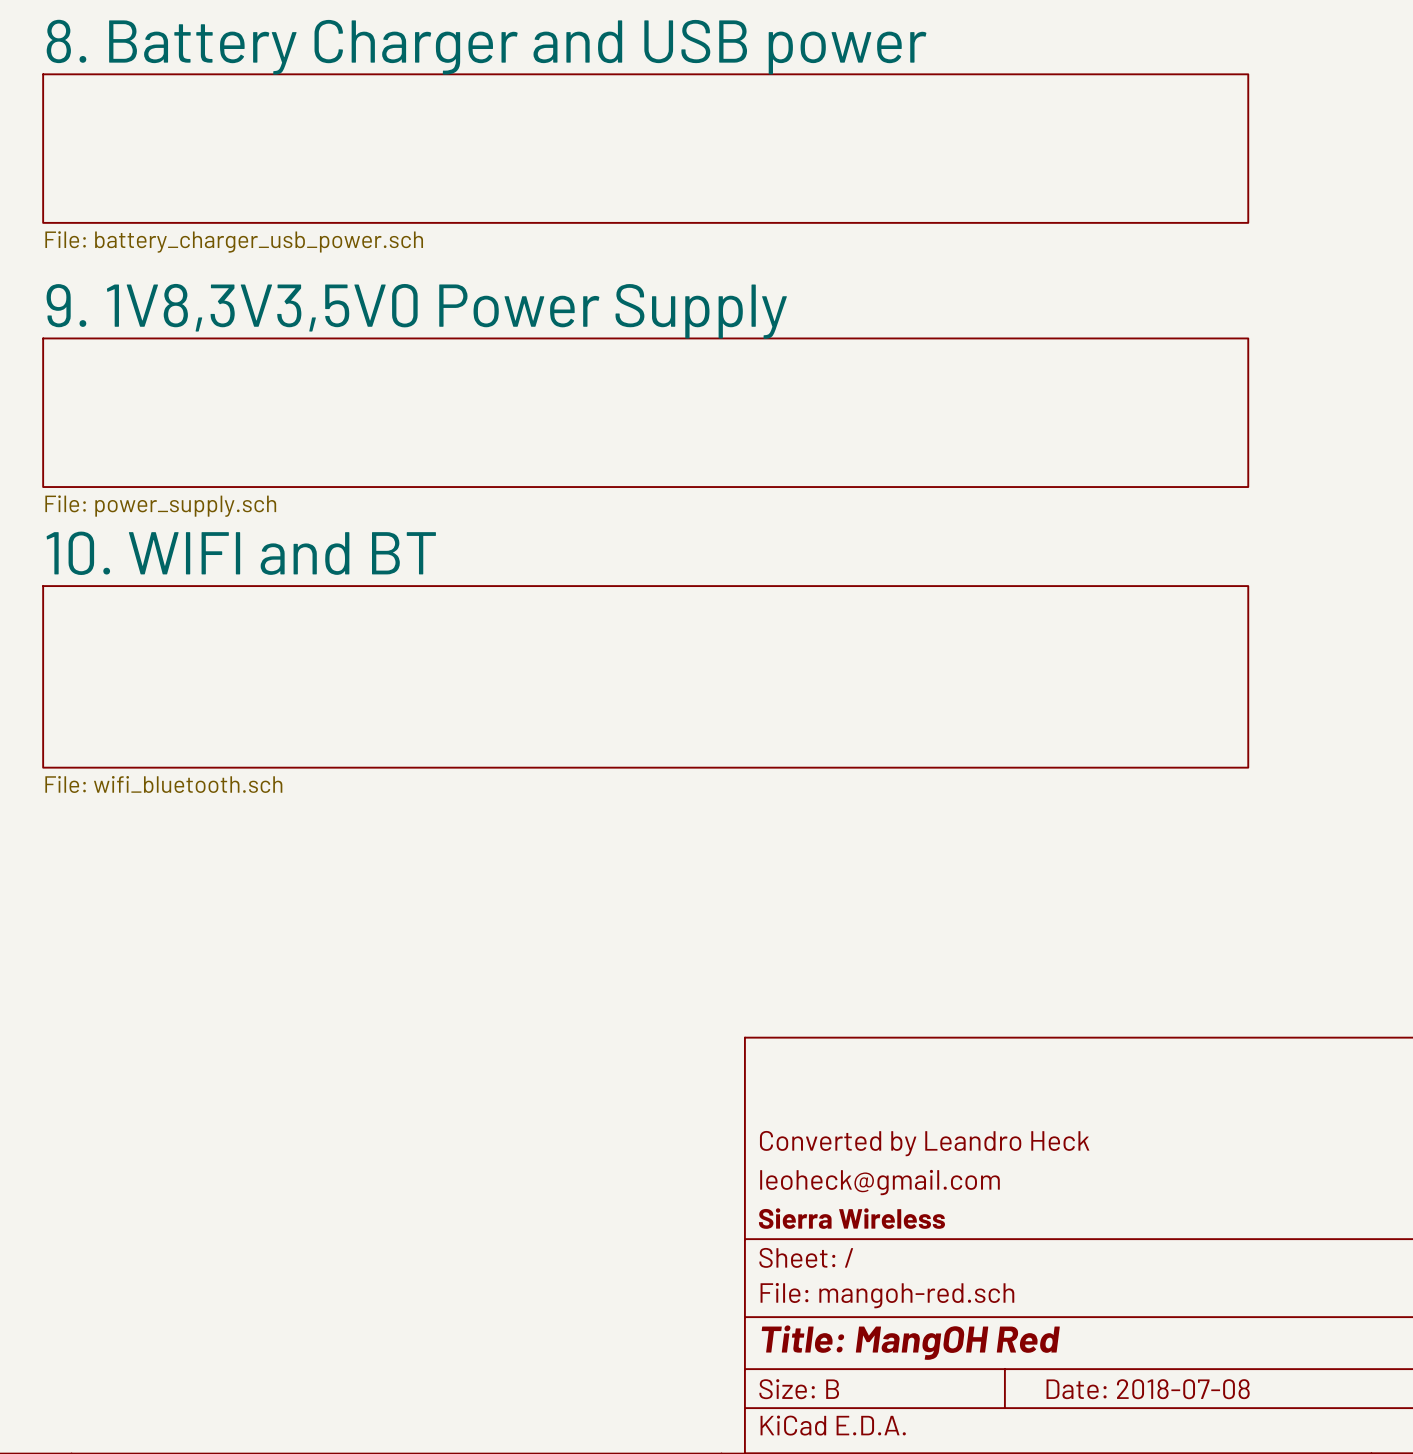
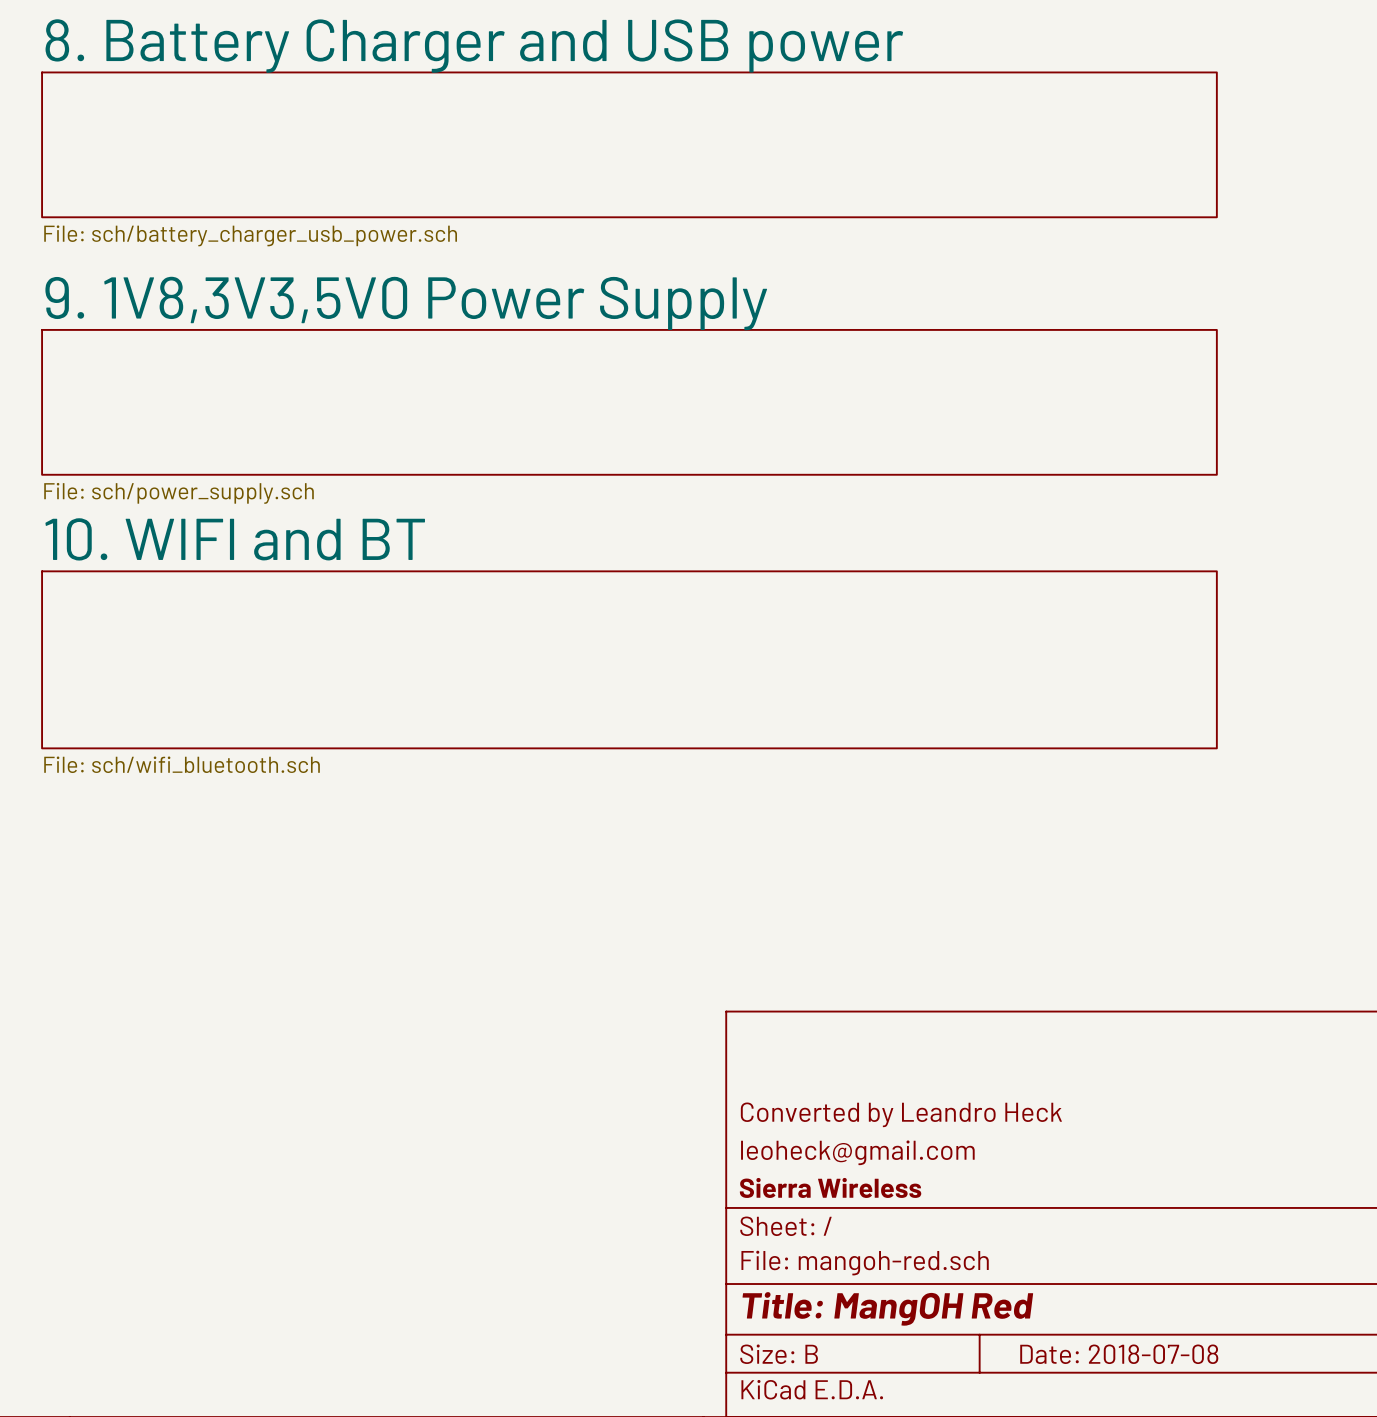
sheet 8. Battery Charger and USB power value: File: battery_charger_usb_power.sch (234, 241) -> File: sch/battery_charger_usb_power.sch (250, 235)
sheet 9. 1V8,3V3,5V0 Power Supply value: File: power_supply.sch (160, 506) -> File: sch/power_supply.sch (179, 493)
sheet 10. WIFI and BT value: File: wifi_bluetooth.sch (163, 784) -> File: sch/wifi_bluetooth.sch (182, 764)

